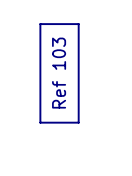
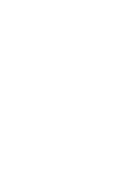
line: (40, 24) (78, 24) (78, 122) (40, 122) (40, 24) -> none
text: Ref 103 (59, 73) -> none

